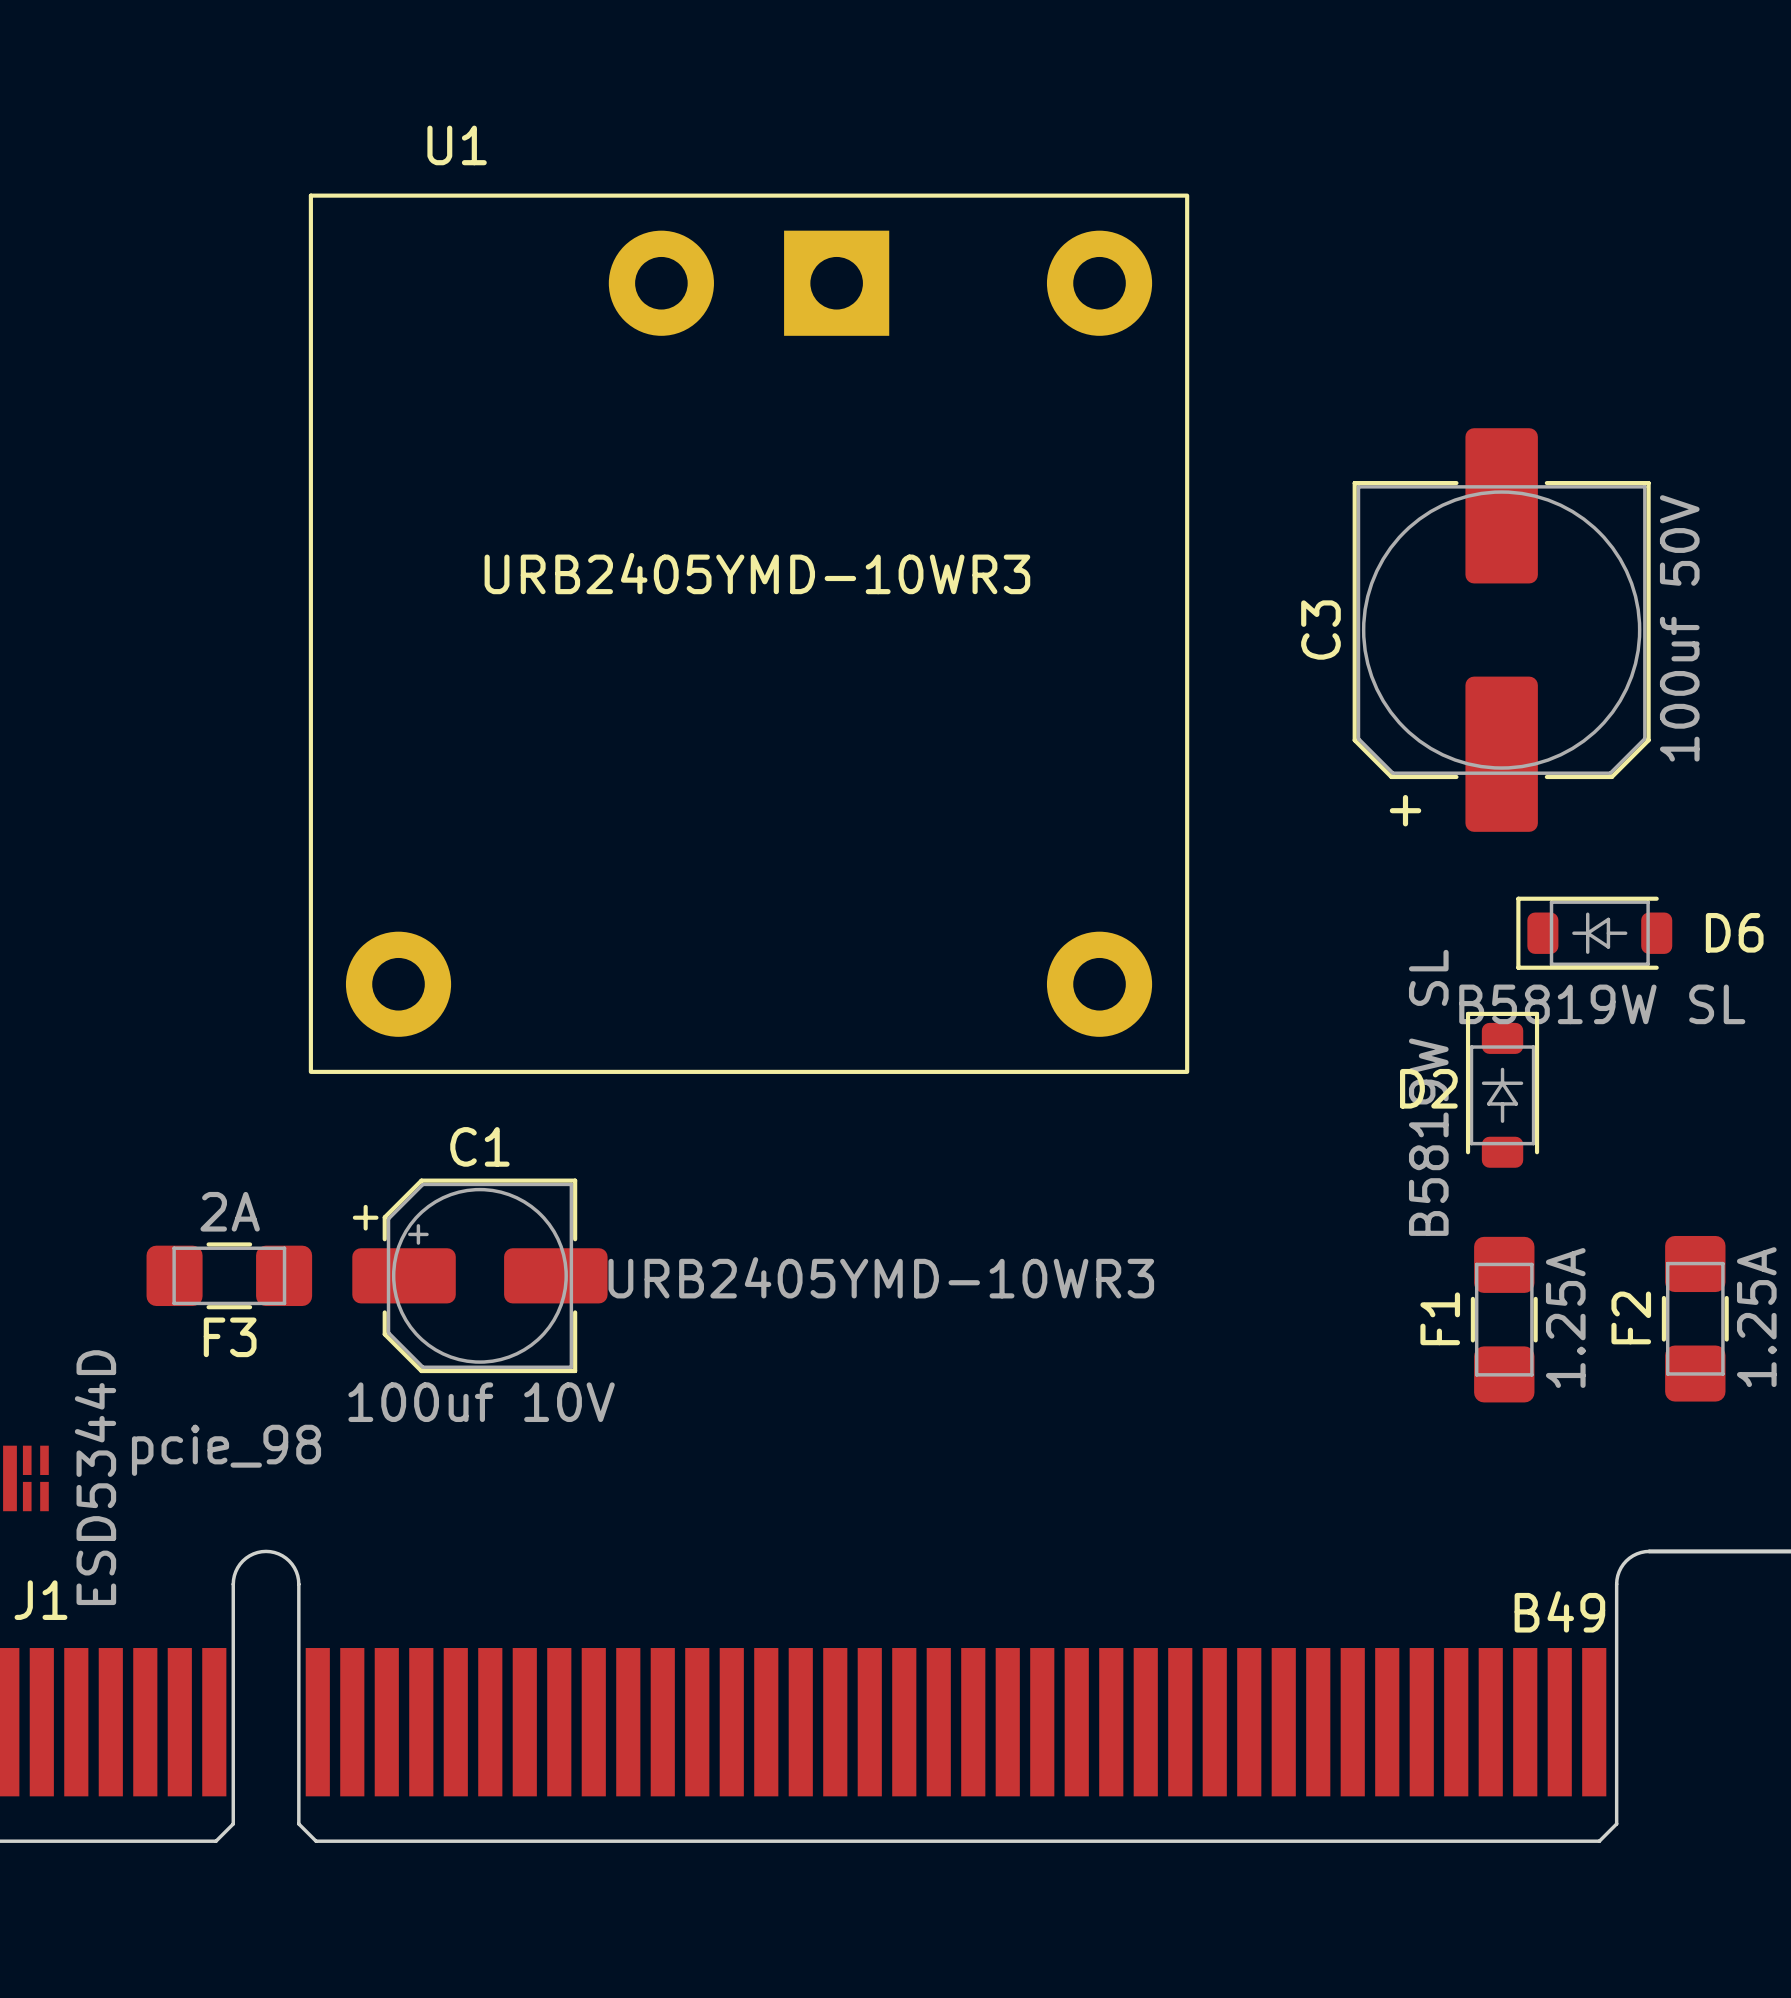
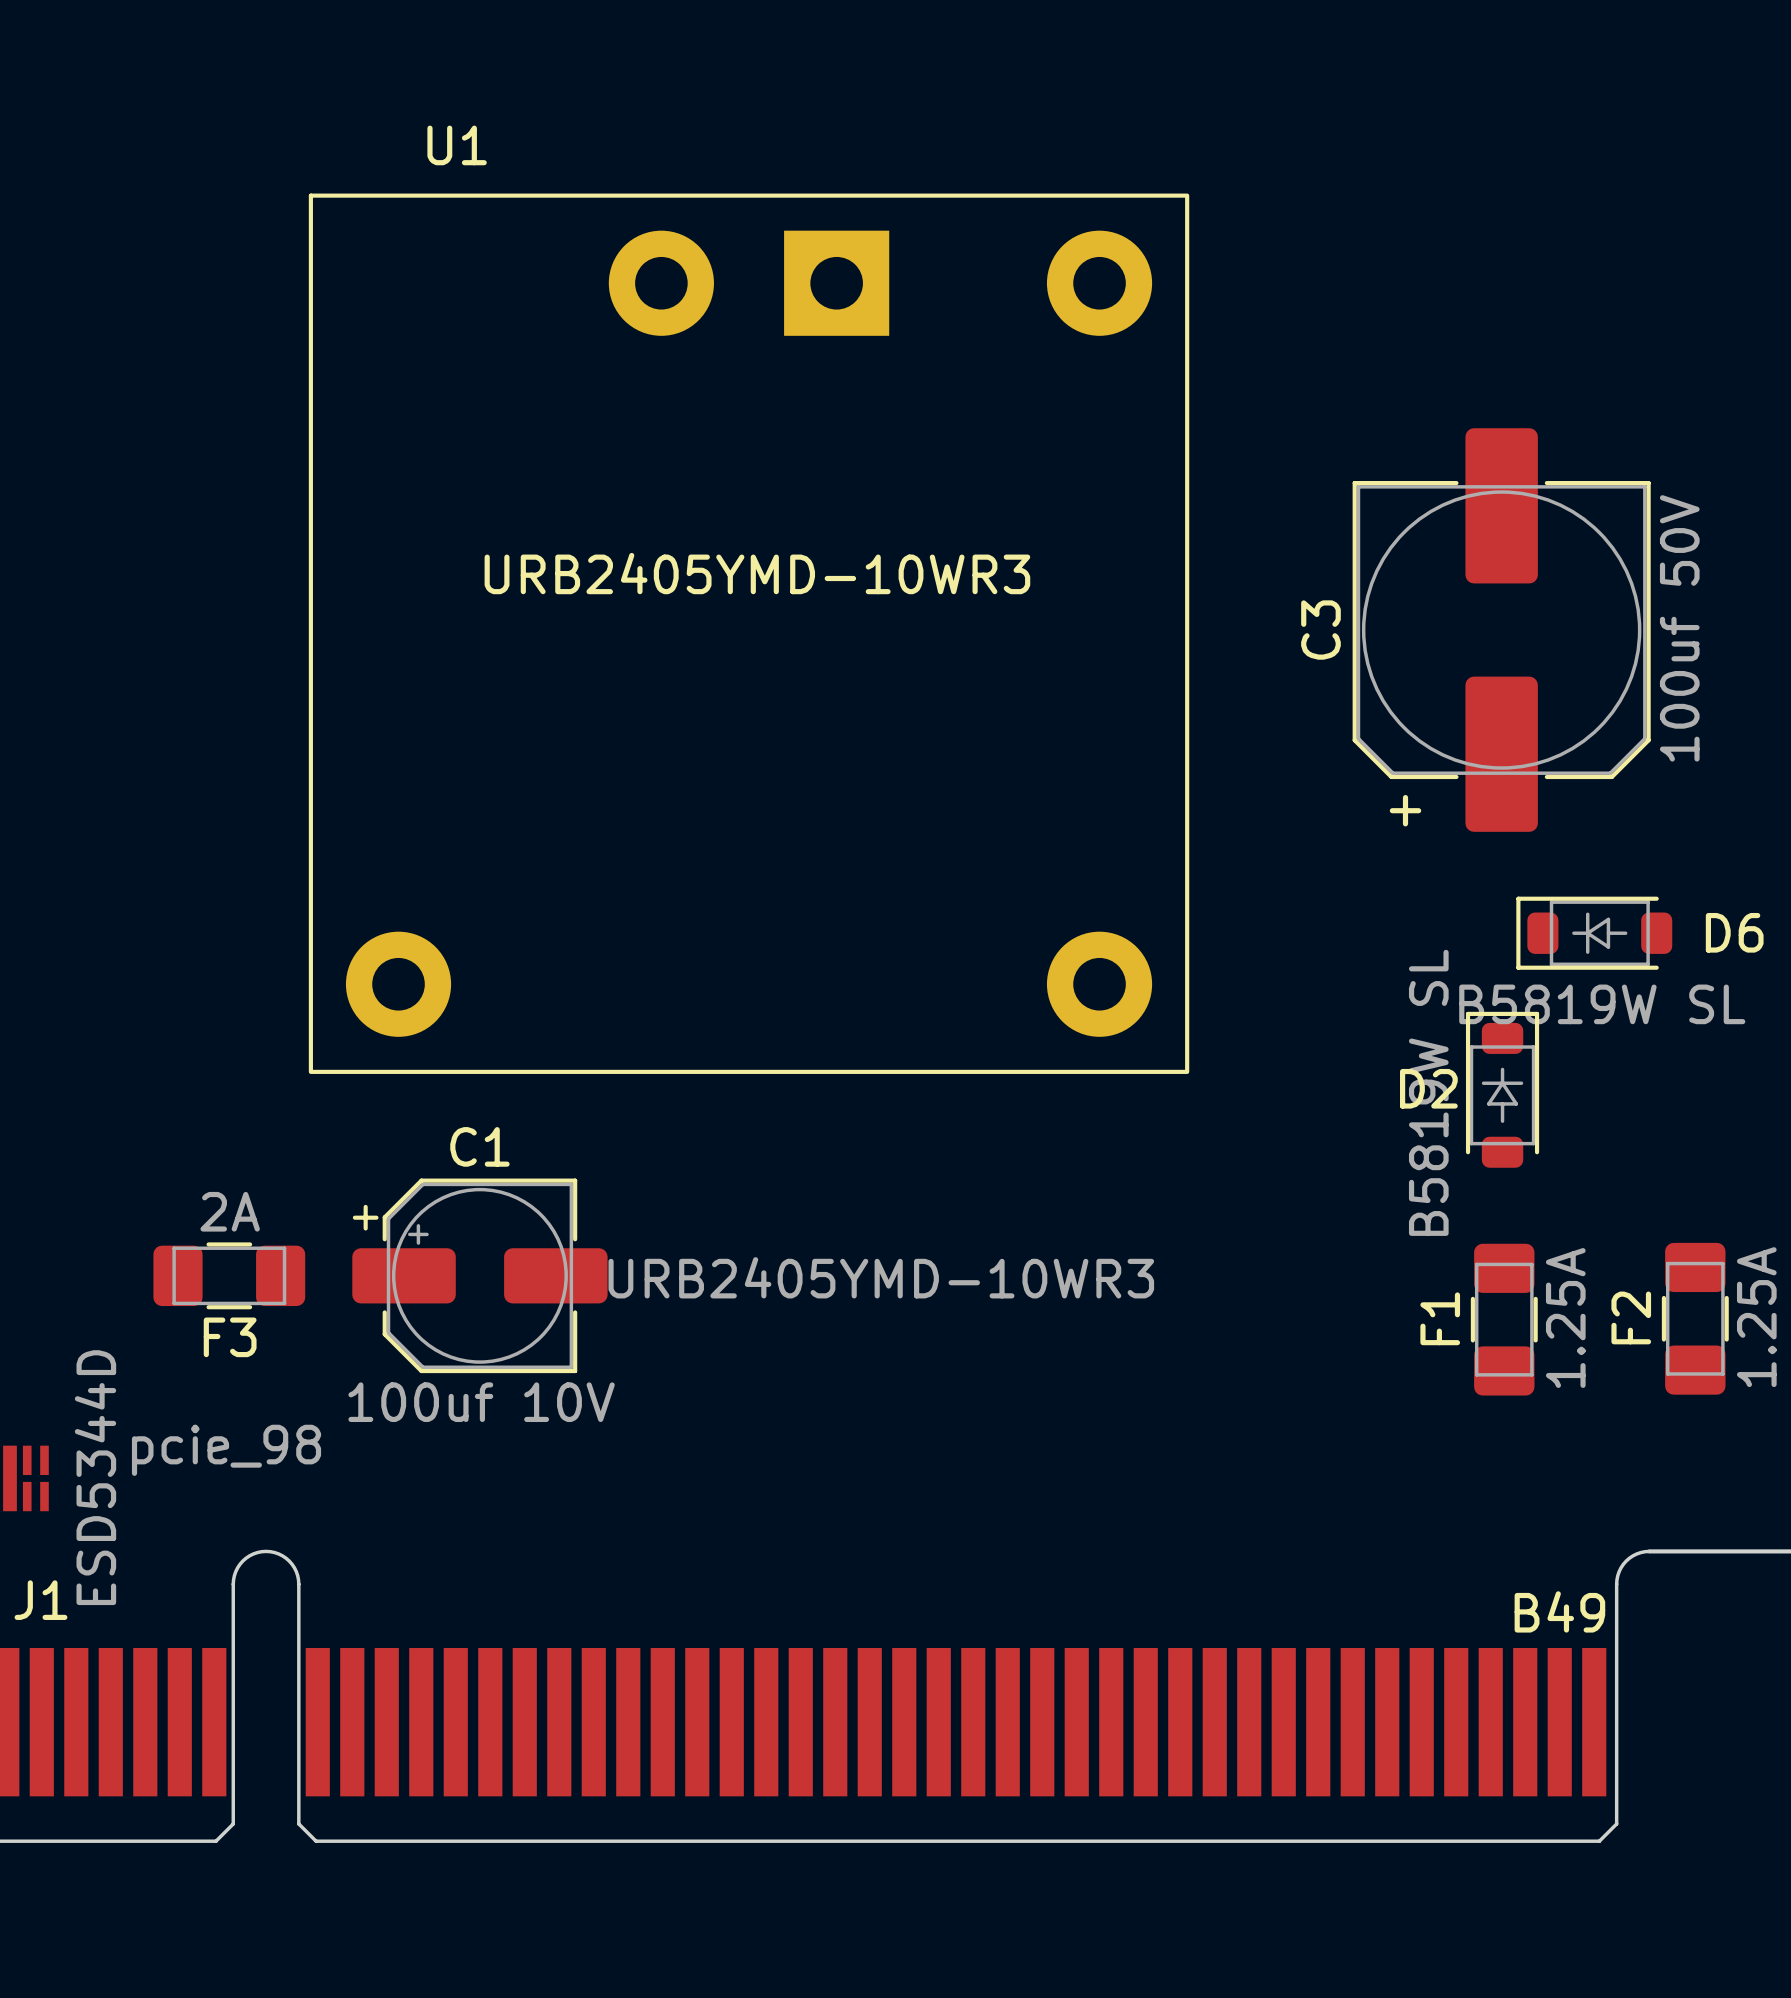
F2 footprint: [1661, 1235, 1729, 1402] -> [1661, 1242, 1729, 1395]
F1 footprint: [1470, 1236, 1538, 1403] -> [1470, 1243, 1538, 1396]
F3 footprint: [146, 1242, 313, 1310] -> [153, 1242, 306, 1310]

